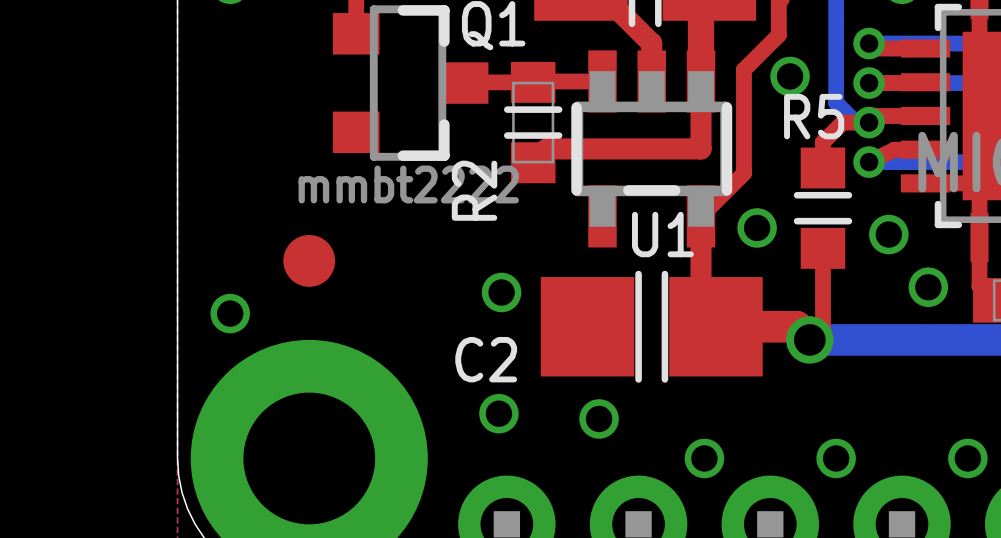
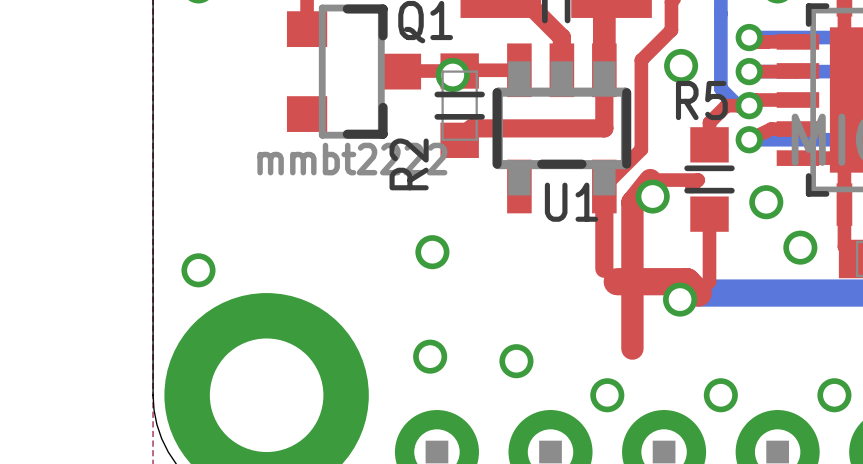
via: none -> (452, 75)
top track: none -> (691, 186) (698, 180) (650, 180) (632, 202) (632, 348)
part: (309, 260) -> none
C2: (651, 326) -> none
via position: (809, 339) -> (680, 299)

